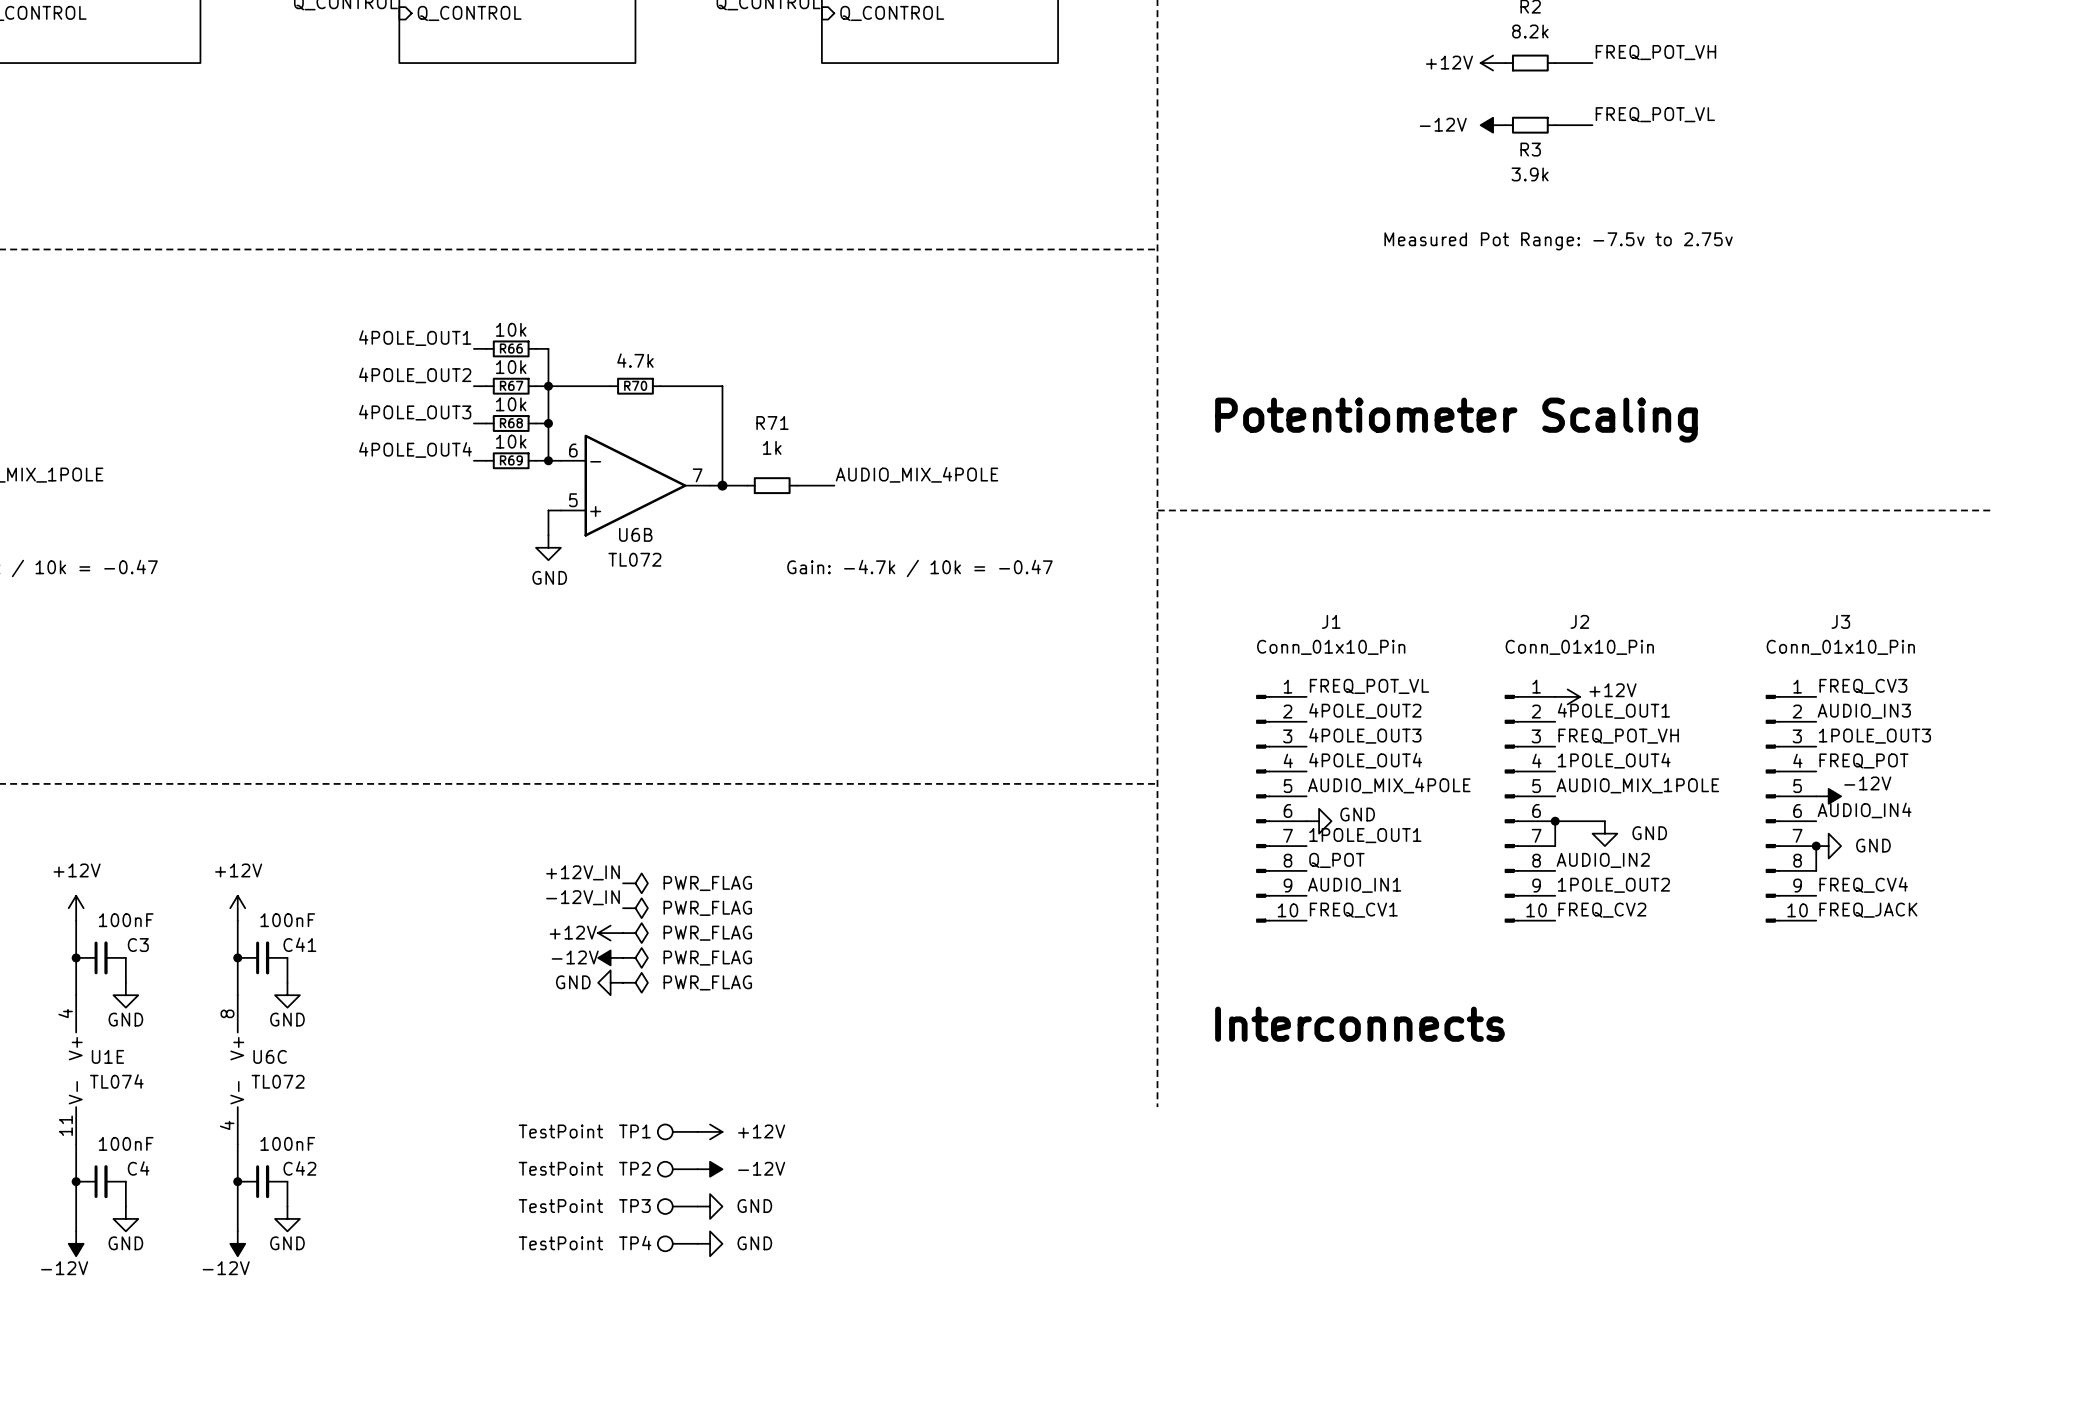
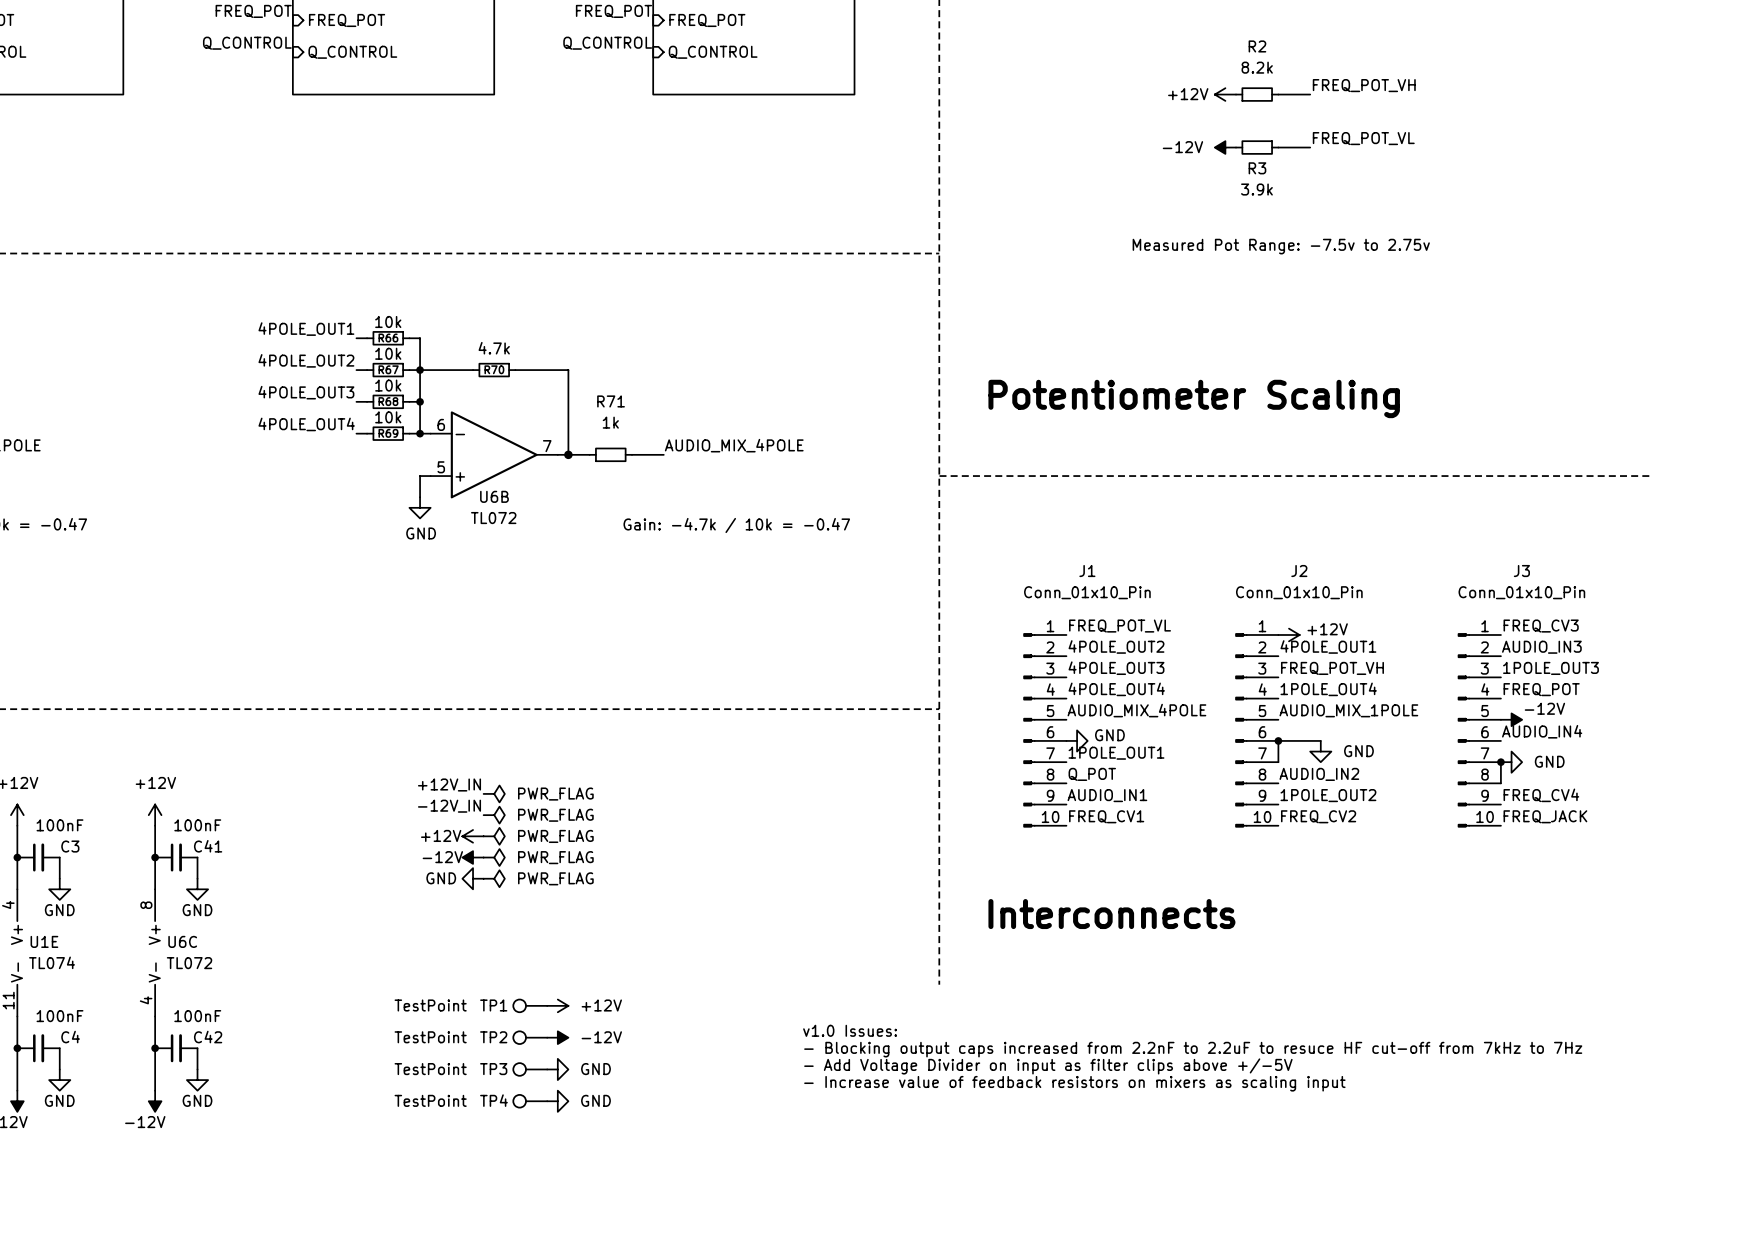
text: none -> v1.0 Issues: (850, 1030)
text: none -> - Blocking output caps increased from 2.2nF to 2.2uF to resuce HF cut-off from 7kHz to 7Hz (1193, 1049)
text: none -> - Add Voltage Divider on input as filter clips above +/-5V (1048, 1066)
text: none -> - Increase value of feedback resistors on mixers as scaling input (1074, 1083)

